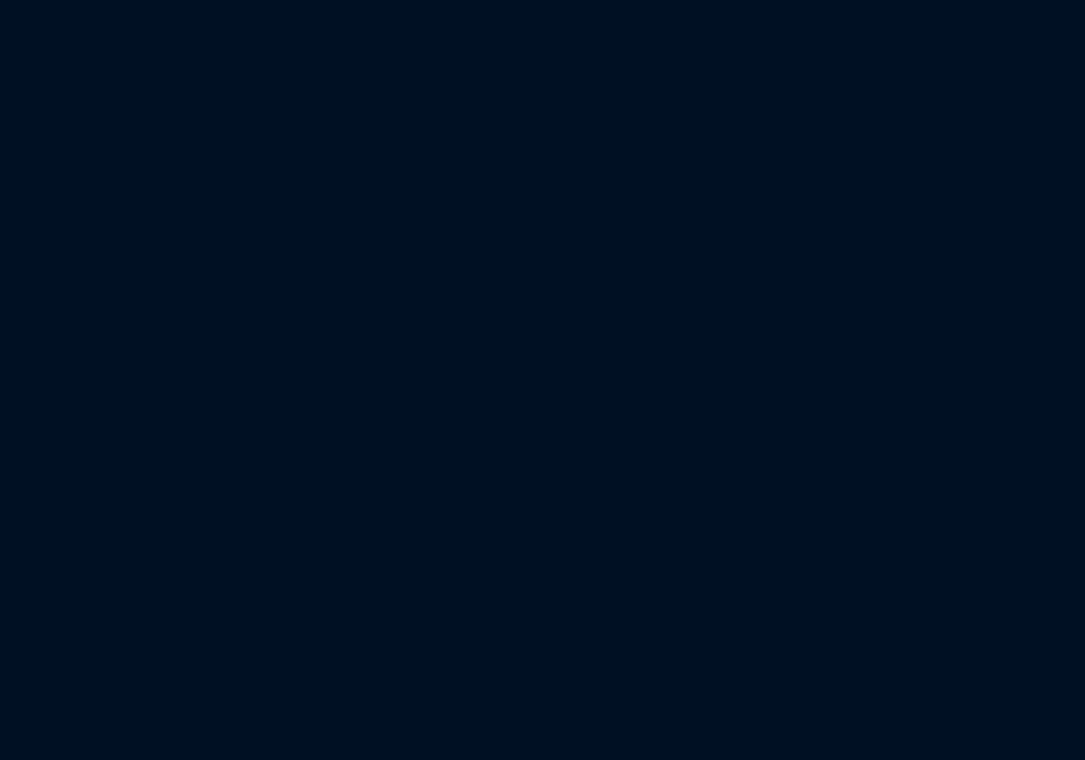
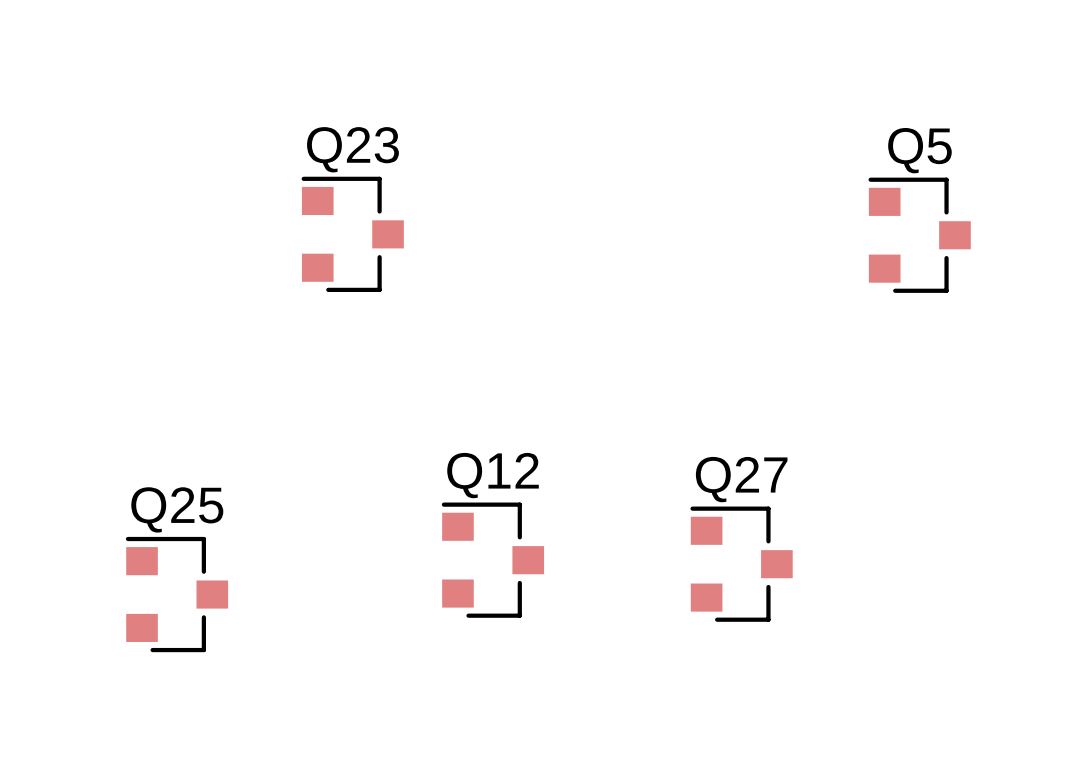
Q23: none -> (352, 234)
Q5: none -> (919, 235)
Q12: none -> (492, 560)
Q27: none -> (741, 564)
Q25: none -> (176, 594)

